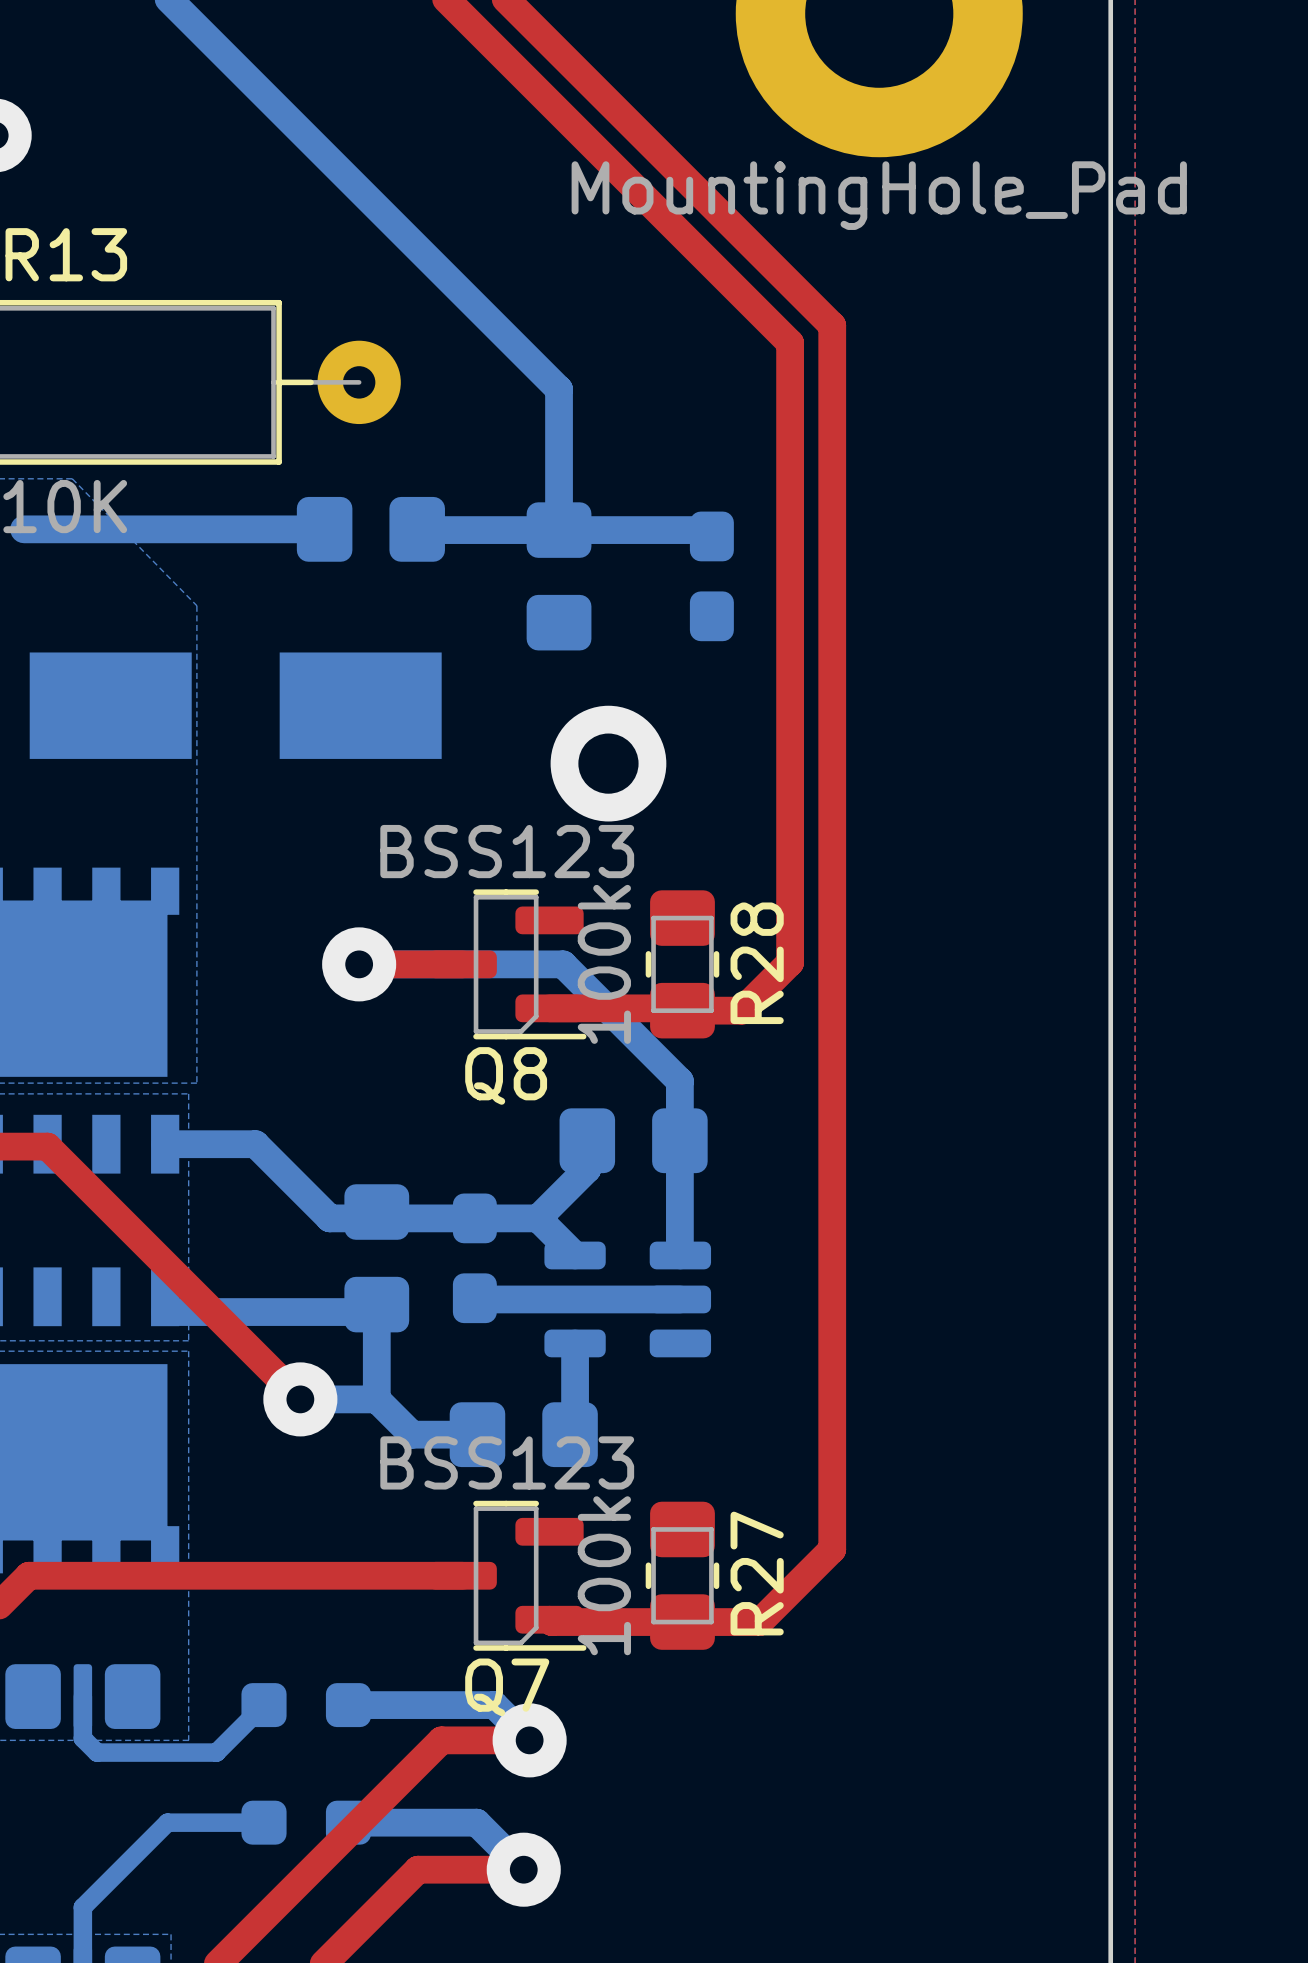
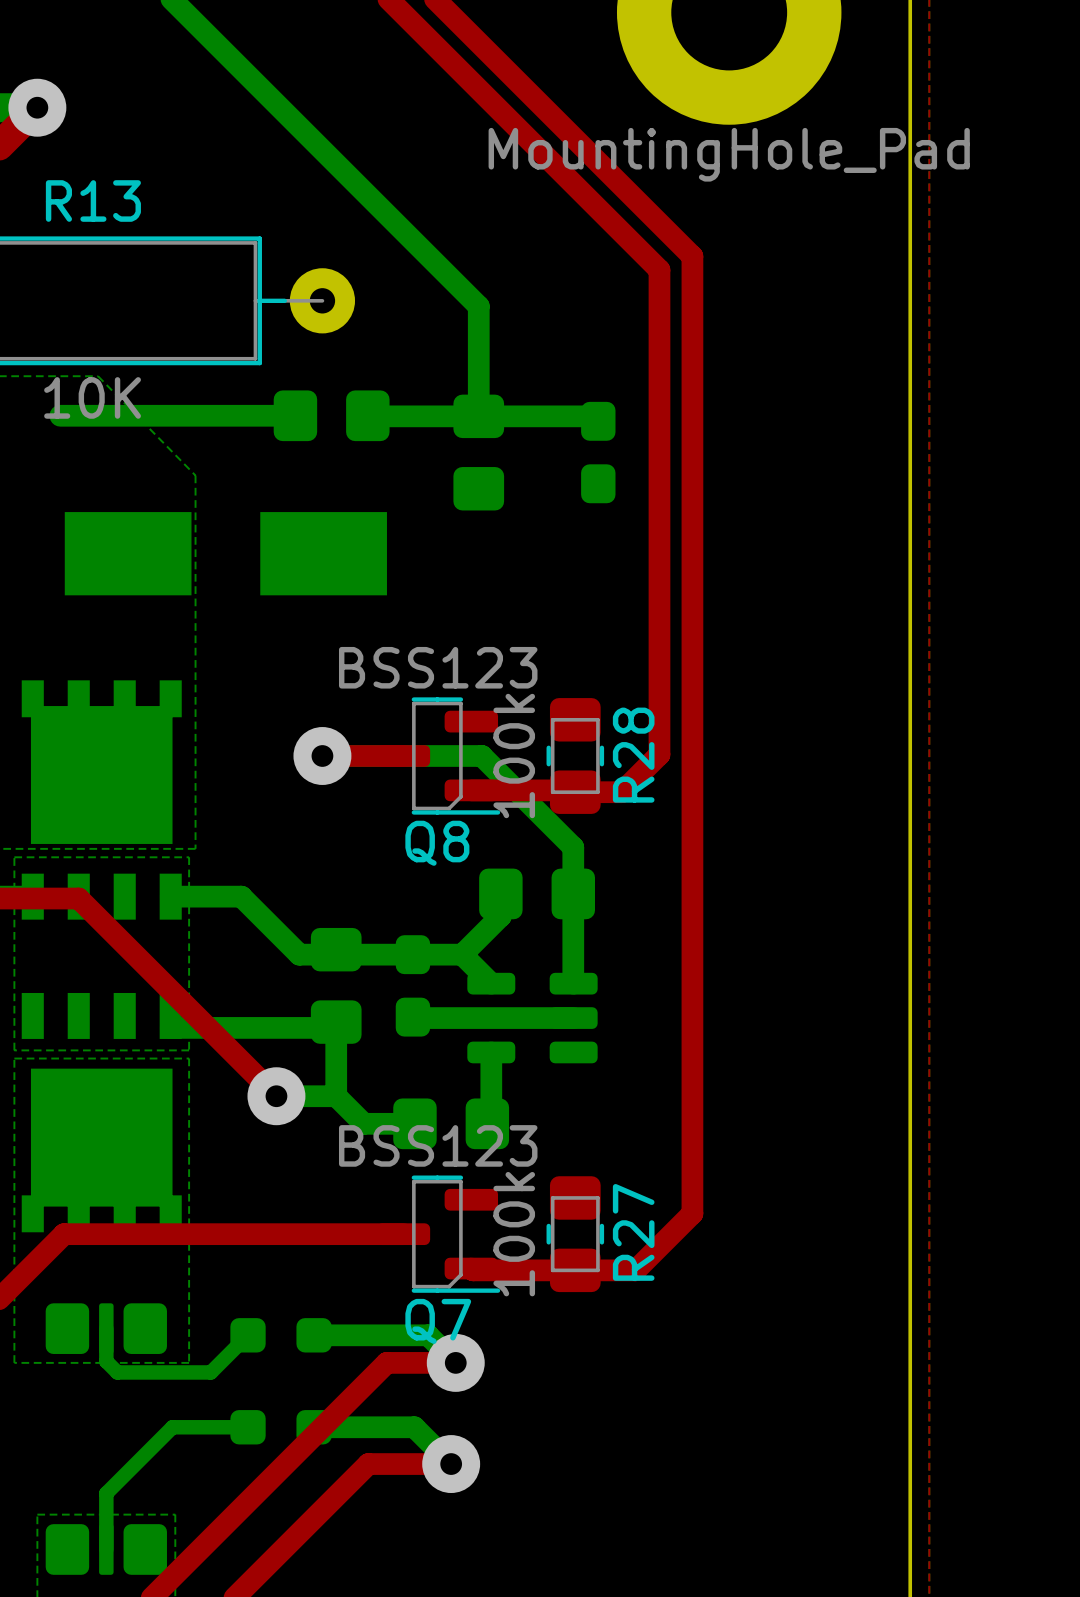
via: (608, 763) -> none

